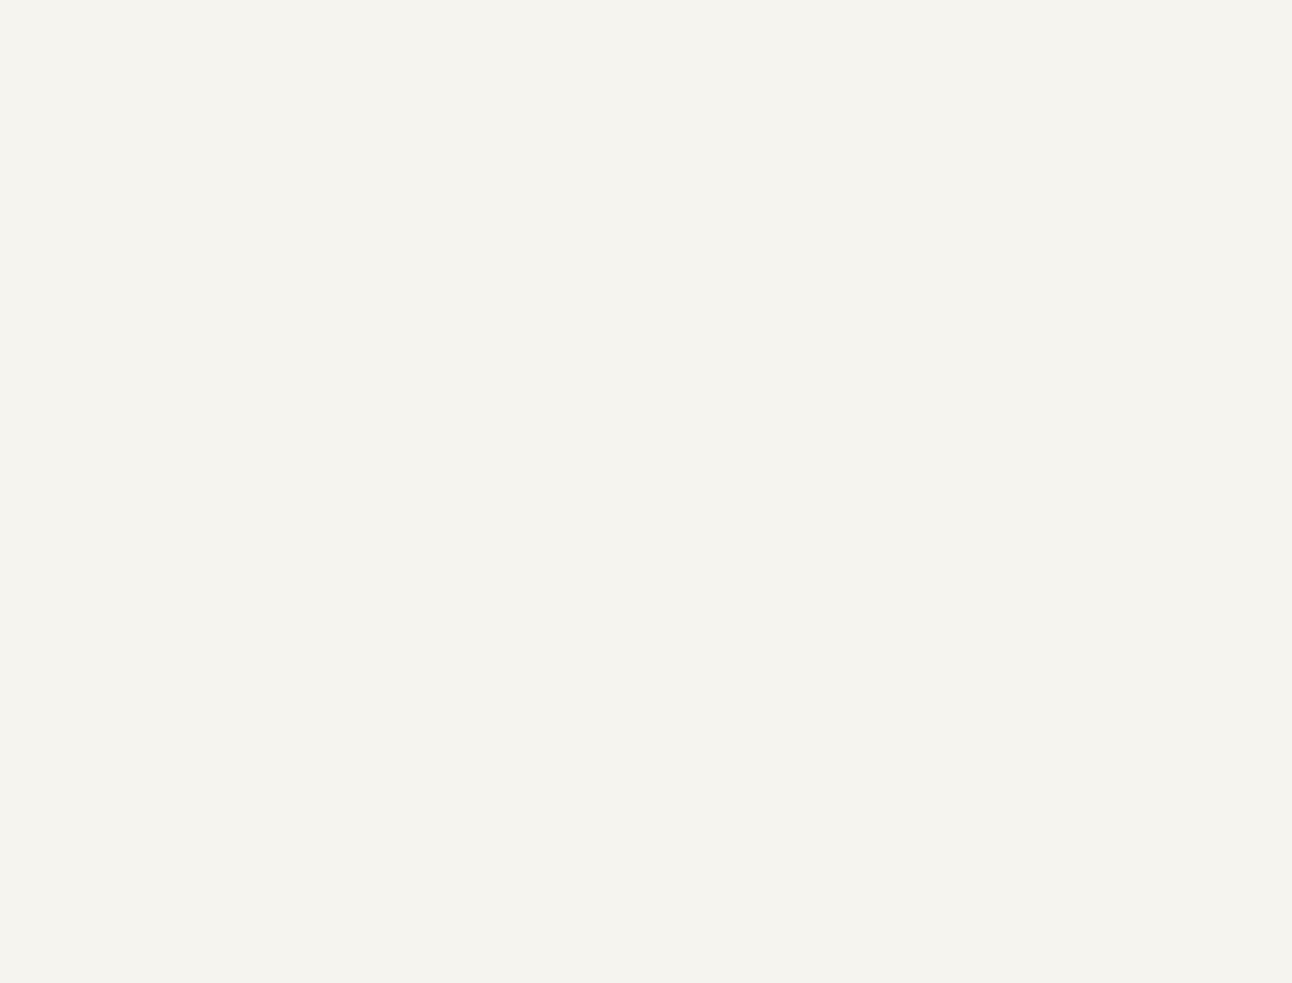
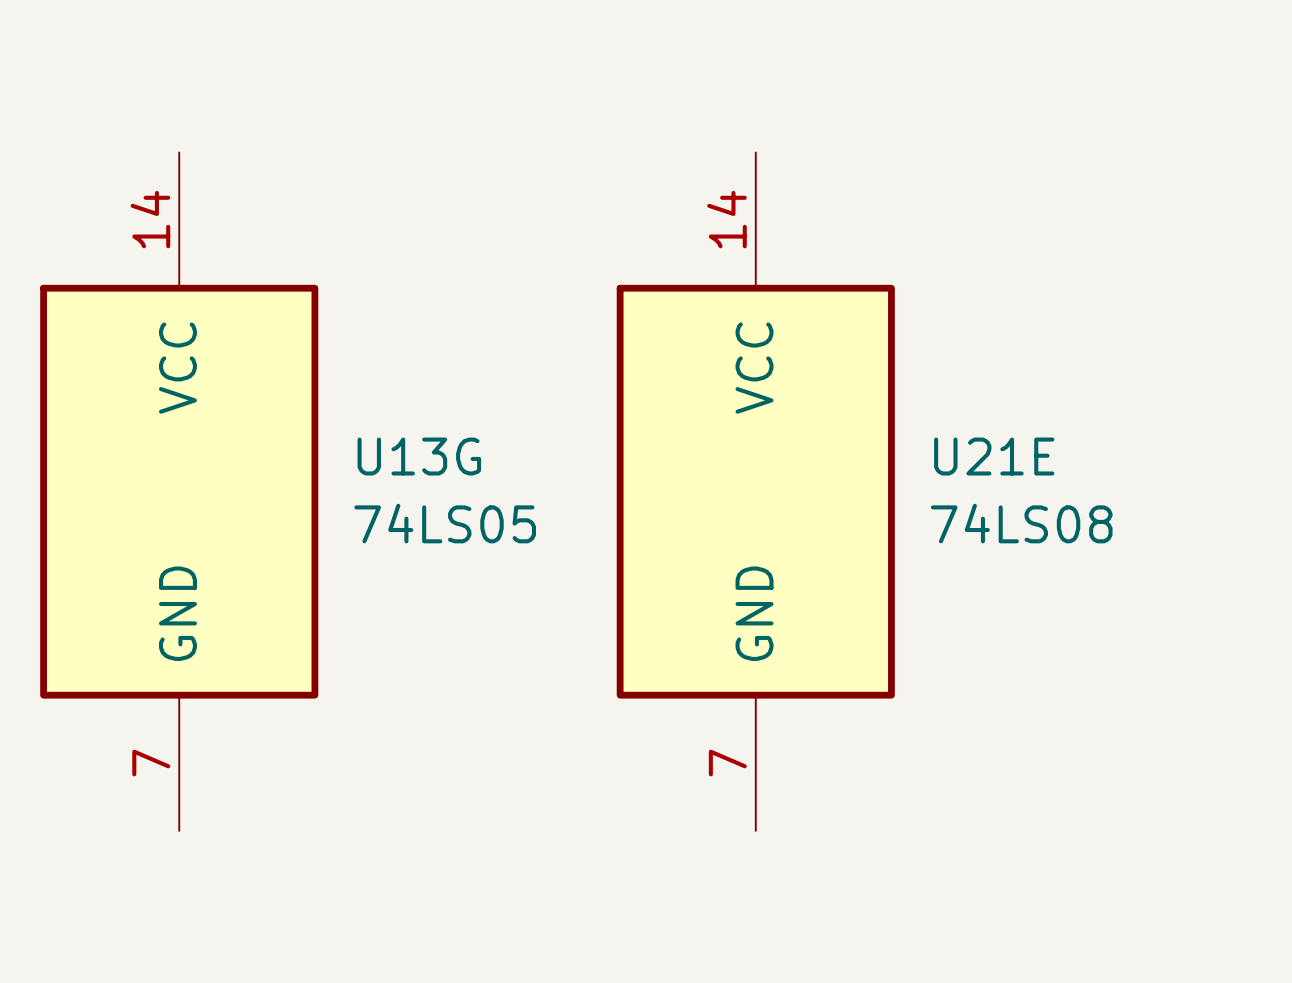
U13G: none -> 74LS05 (179, 491)
U21E: none -> 74LS08 (755, 491)

